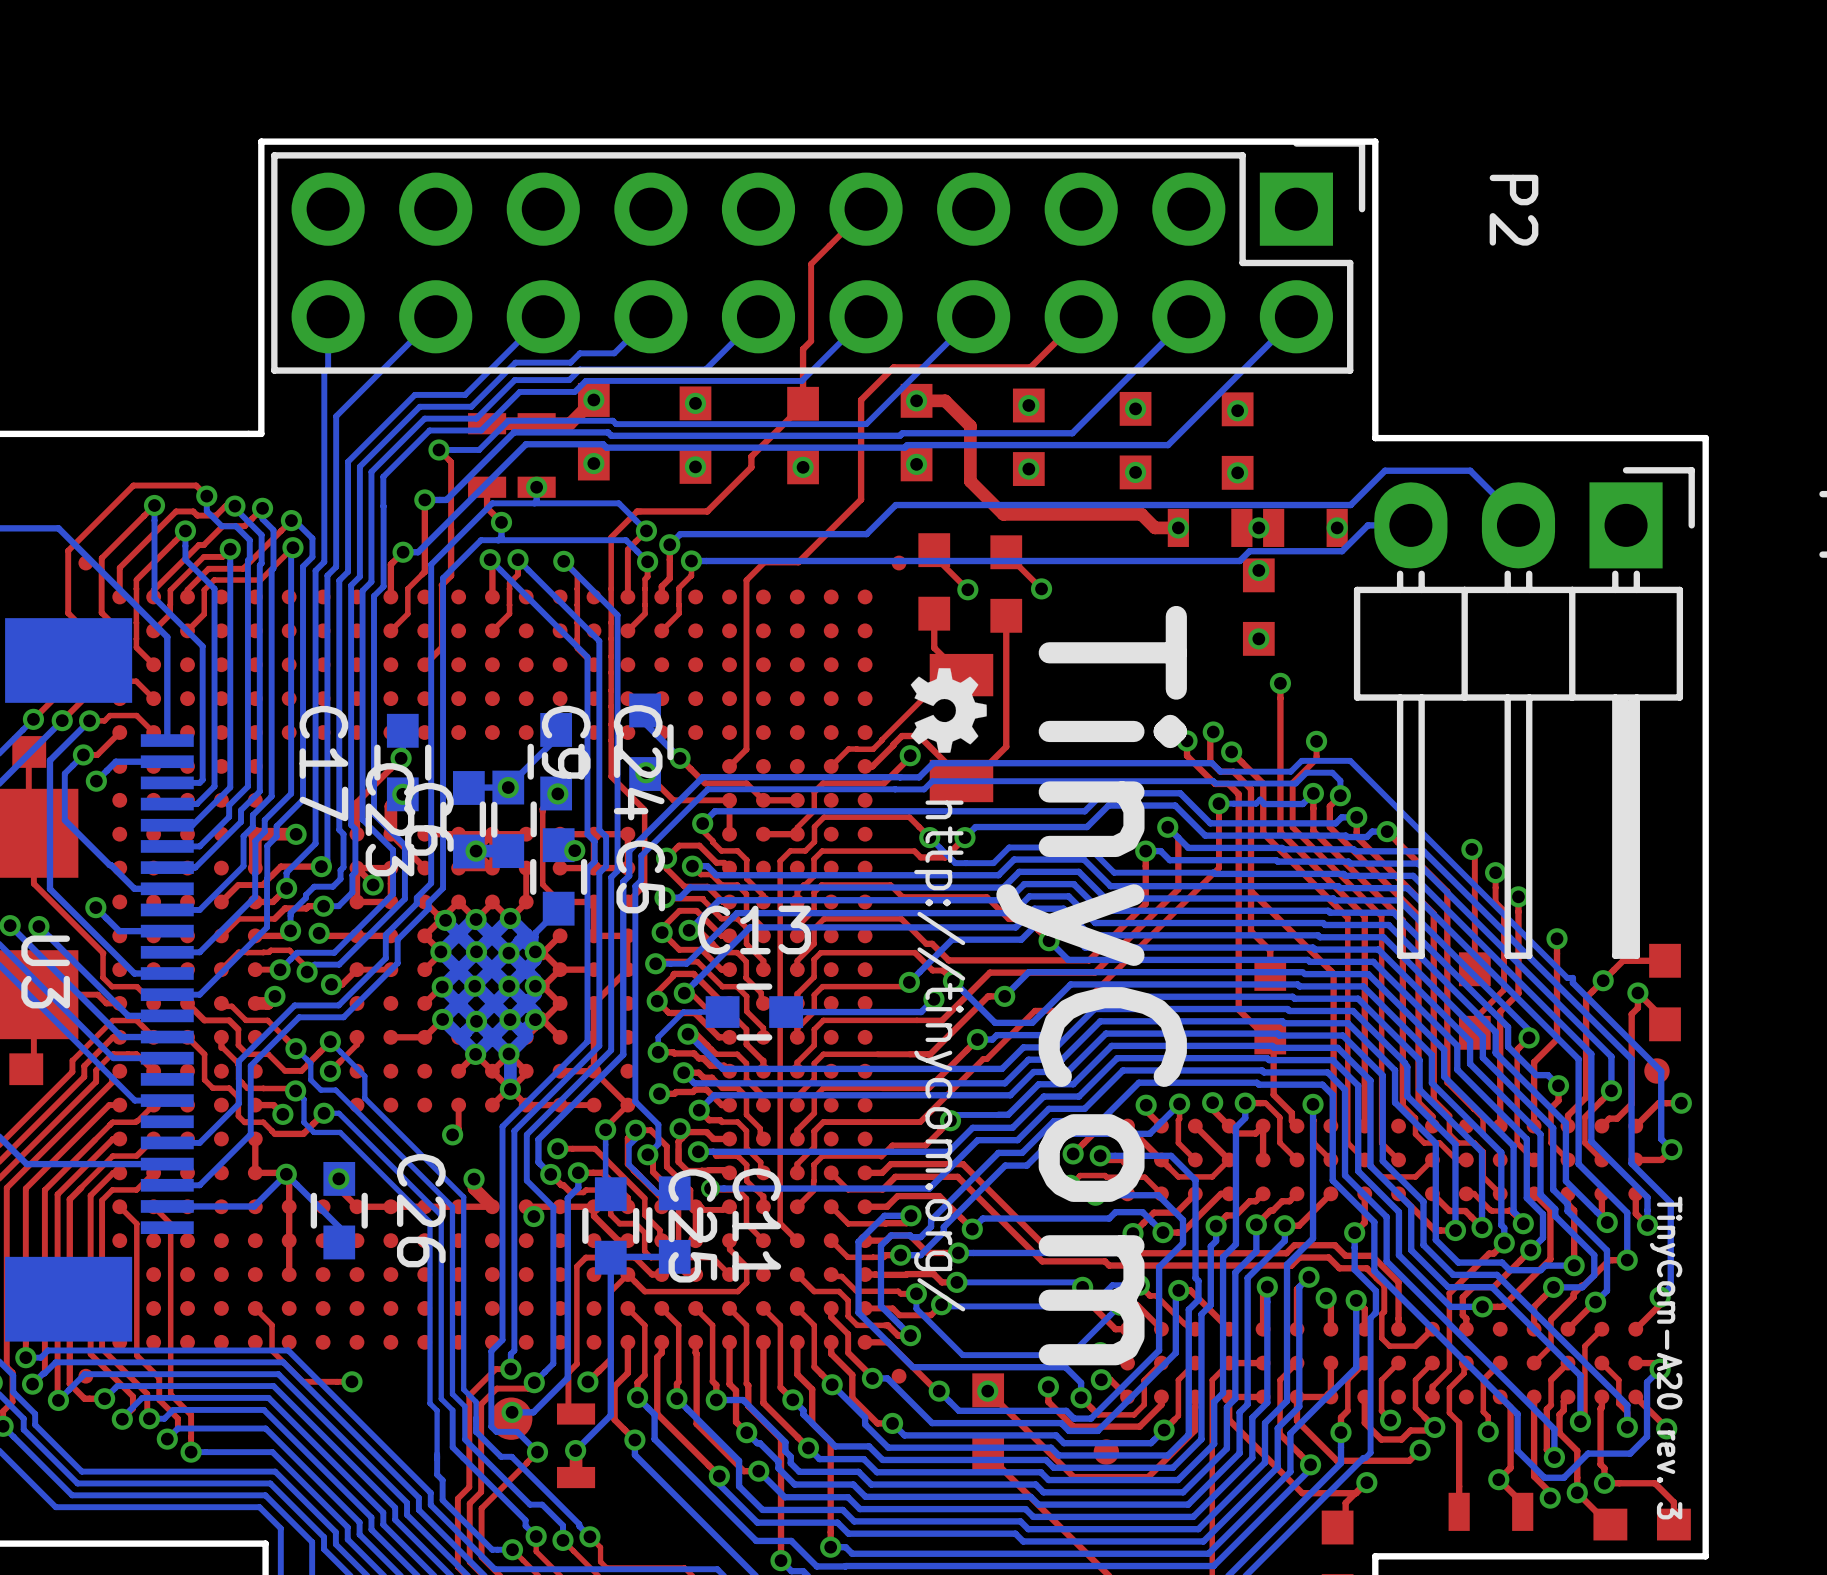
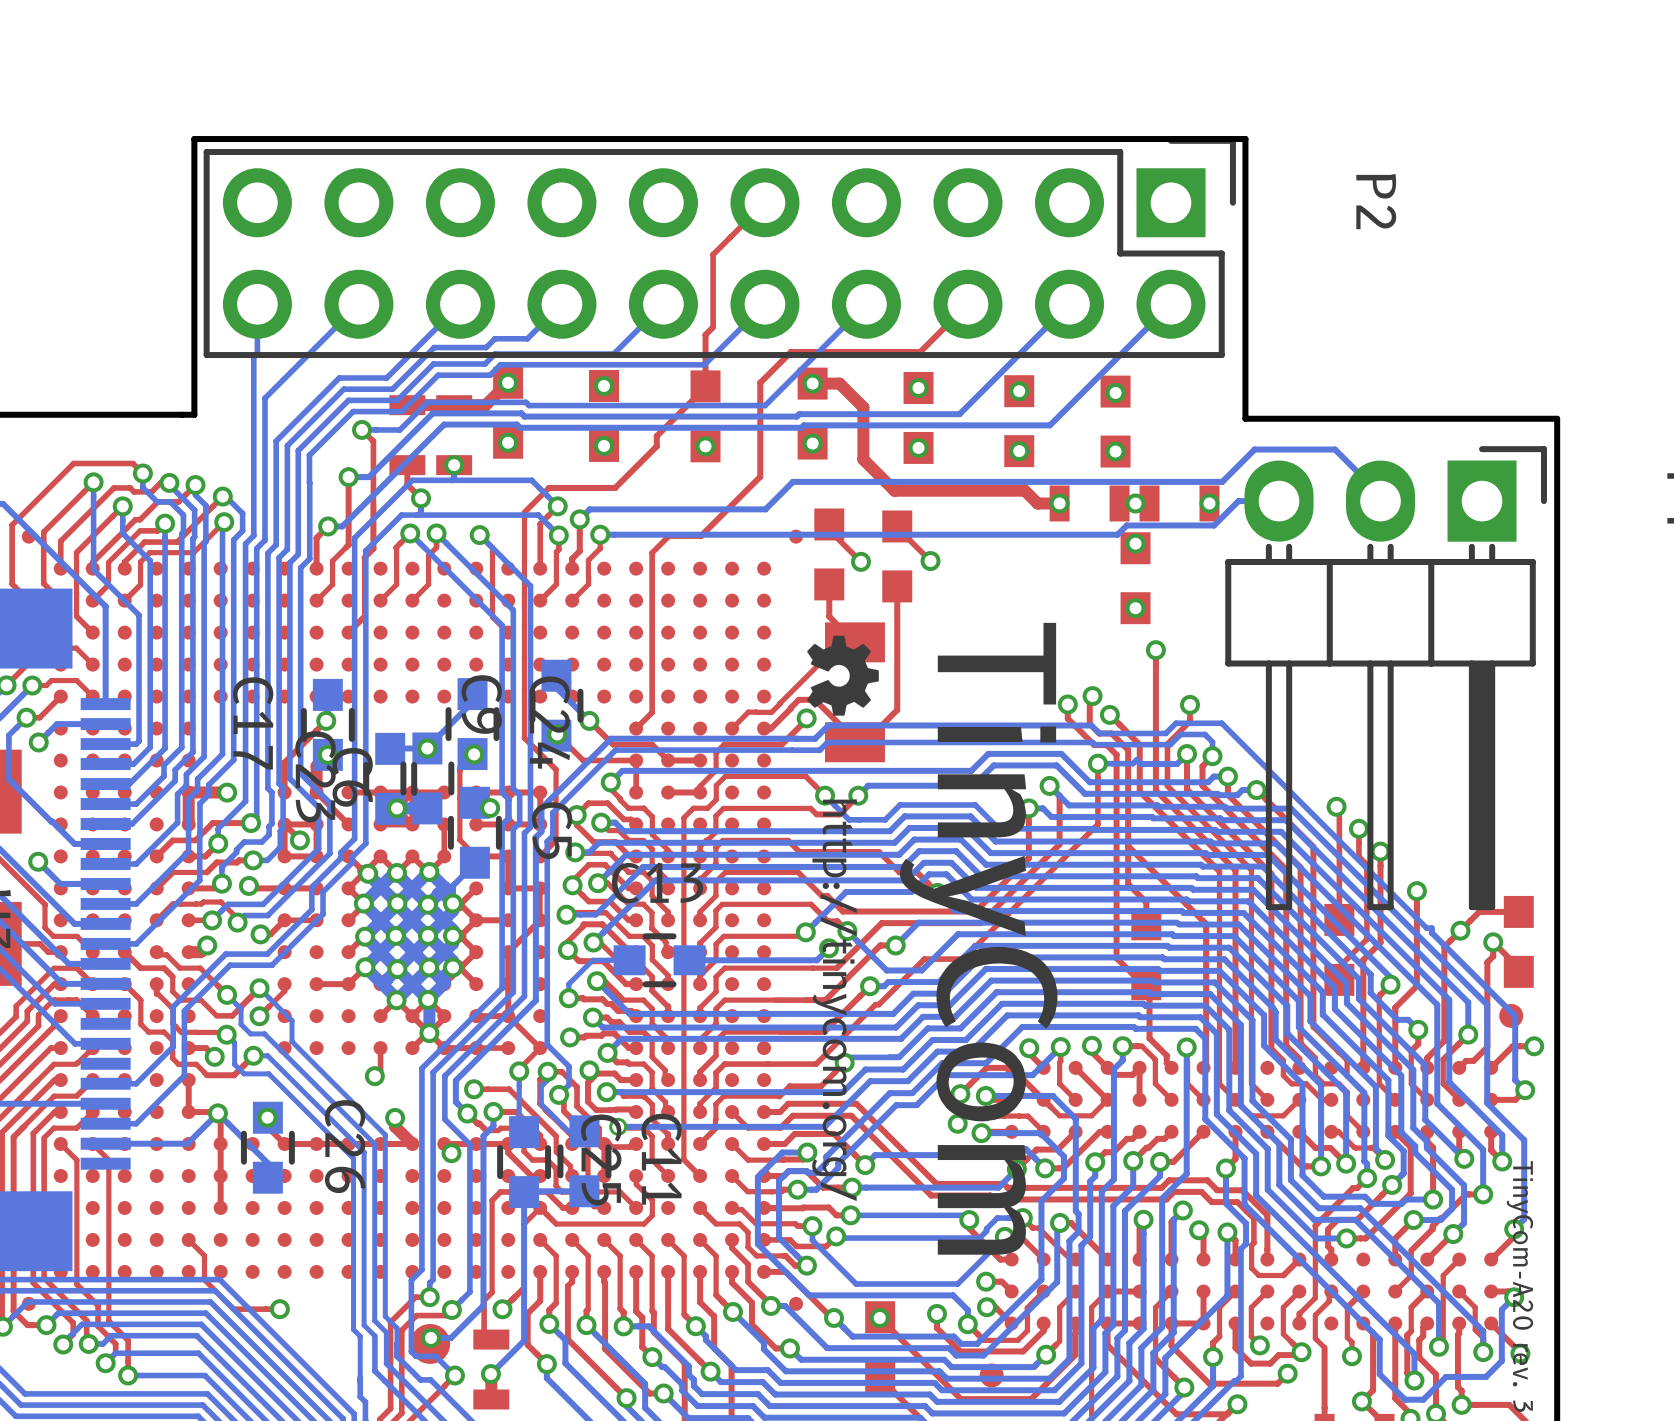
top track: (490, 559) (492, 561) (492, 596) -> (410, 533) (395, 547) (396, 584) (380, 600)

